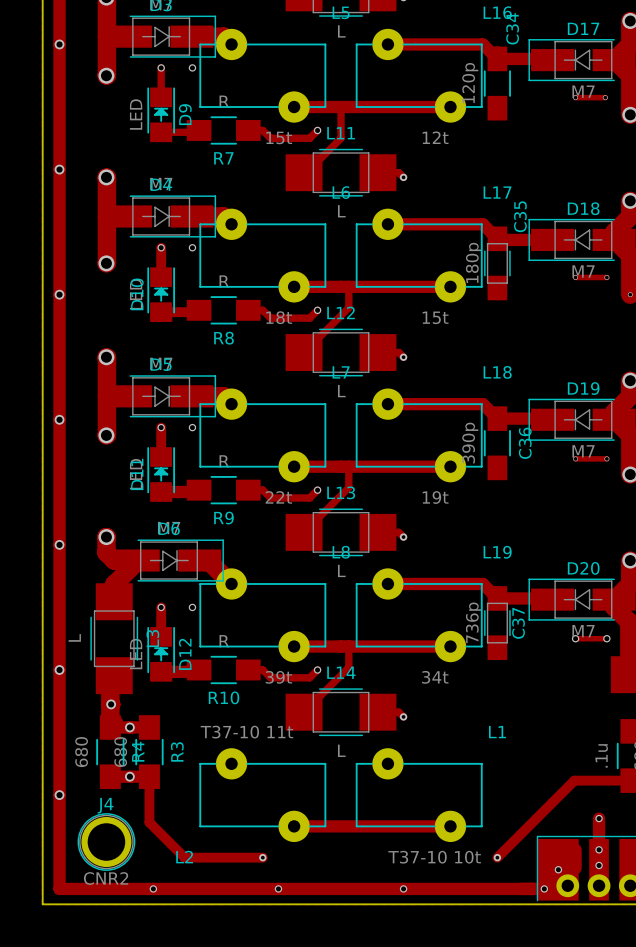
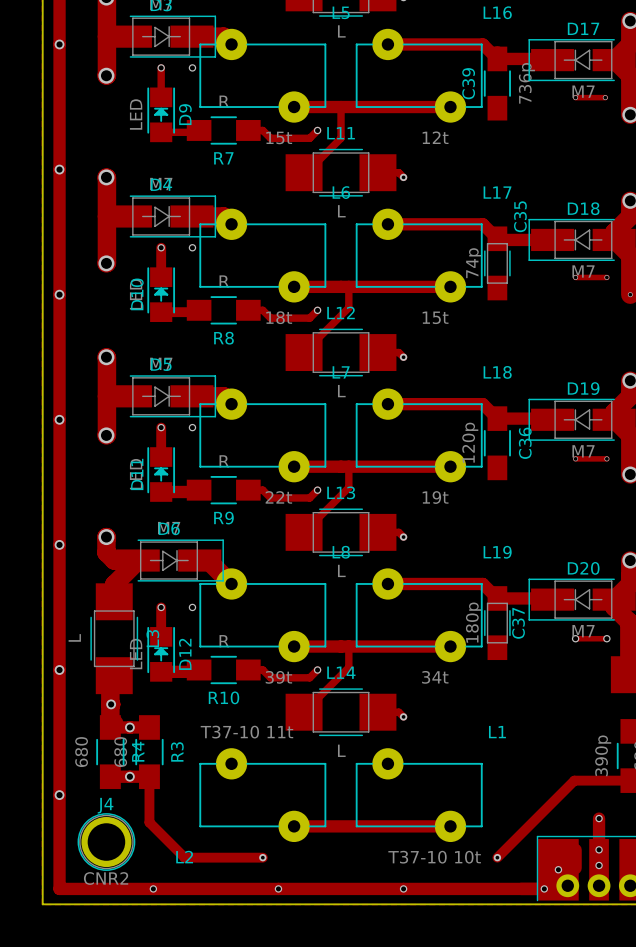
C34 name: C34 (512, 28) -> C39 (468, 83)
C34 value: 120p (470, 83) -> 736p (526, 83)
C35 value: 180p (473, 262) -> 74p (474, 263)
C36 value: 390p (470, 443) -> 120p (470, 442)
C37 value: 736p (473, 622) -> 180p (473, 622)
part value: .1u (601, 755) -> 390p (603, 755)

